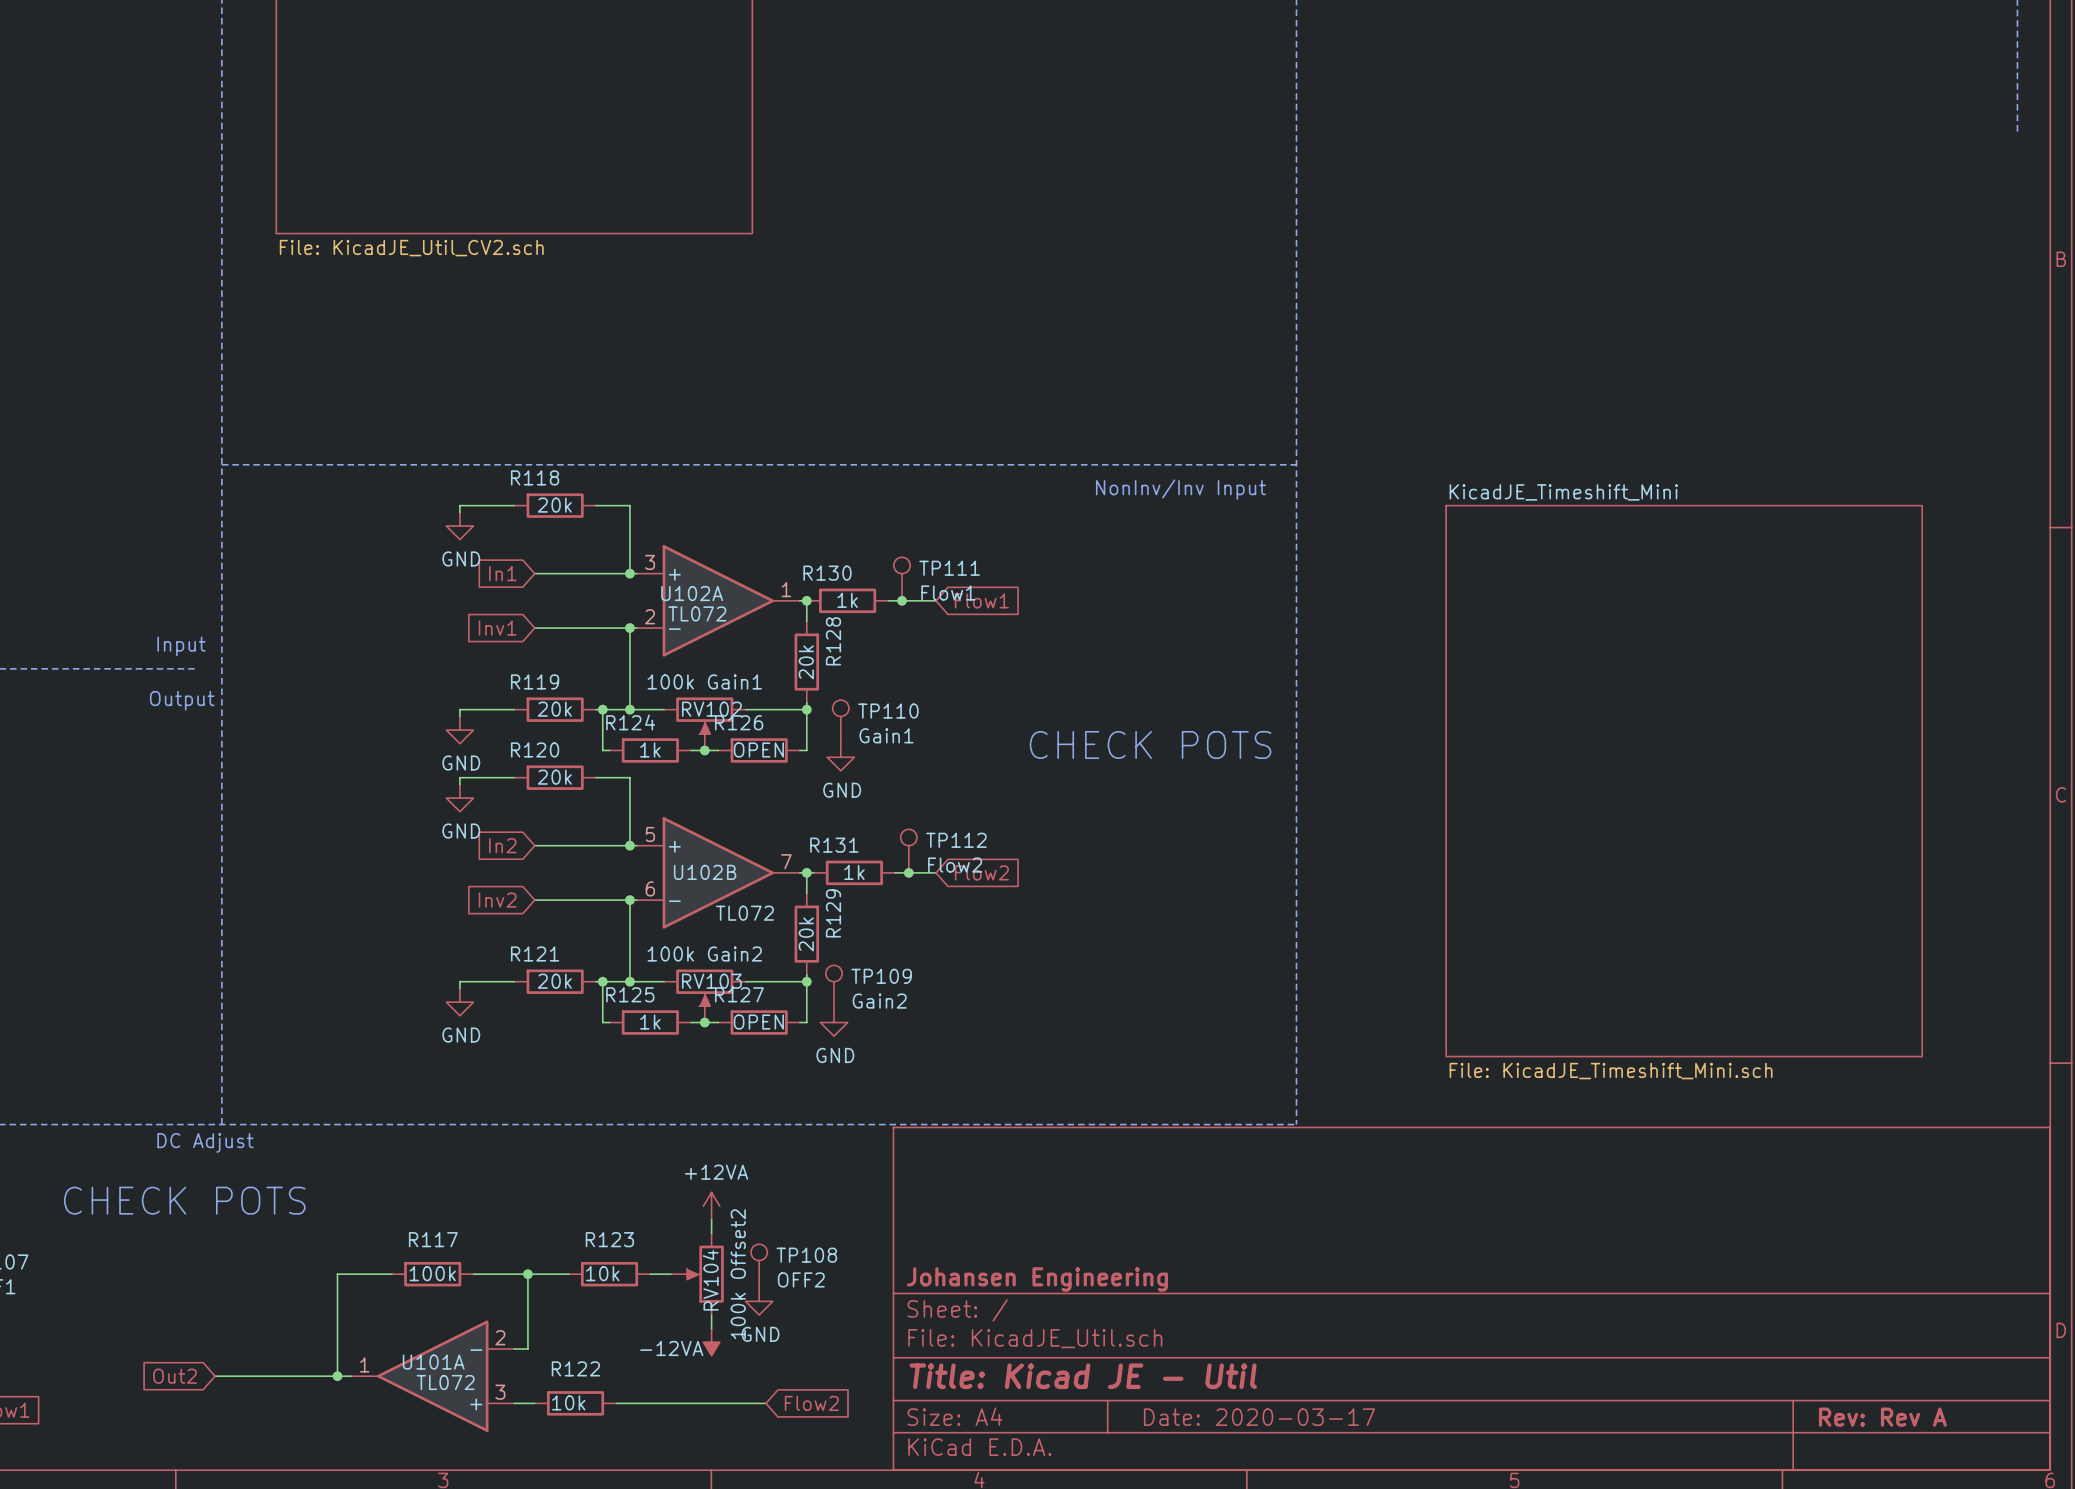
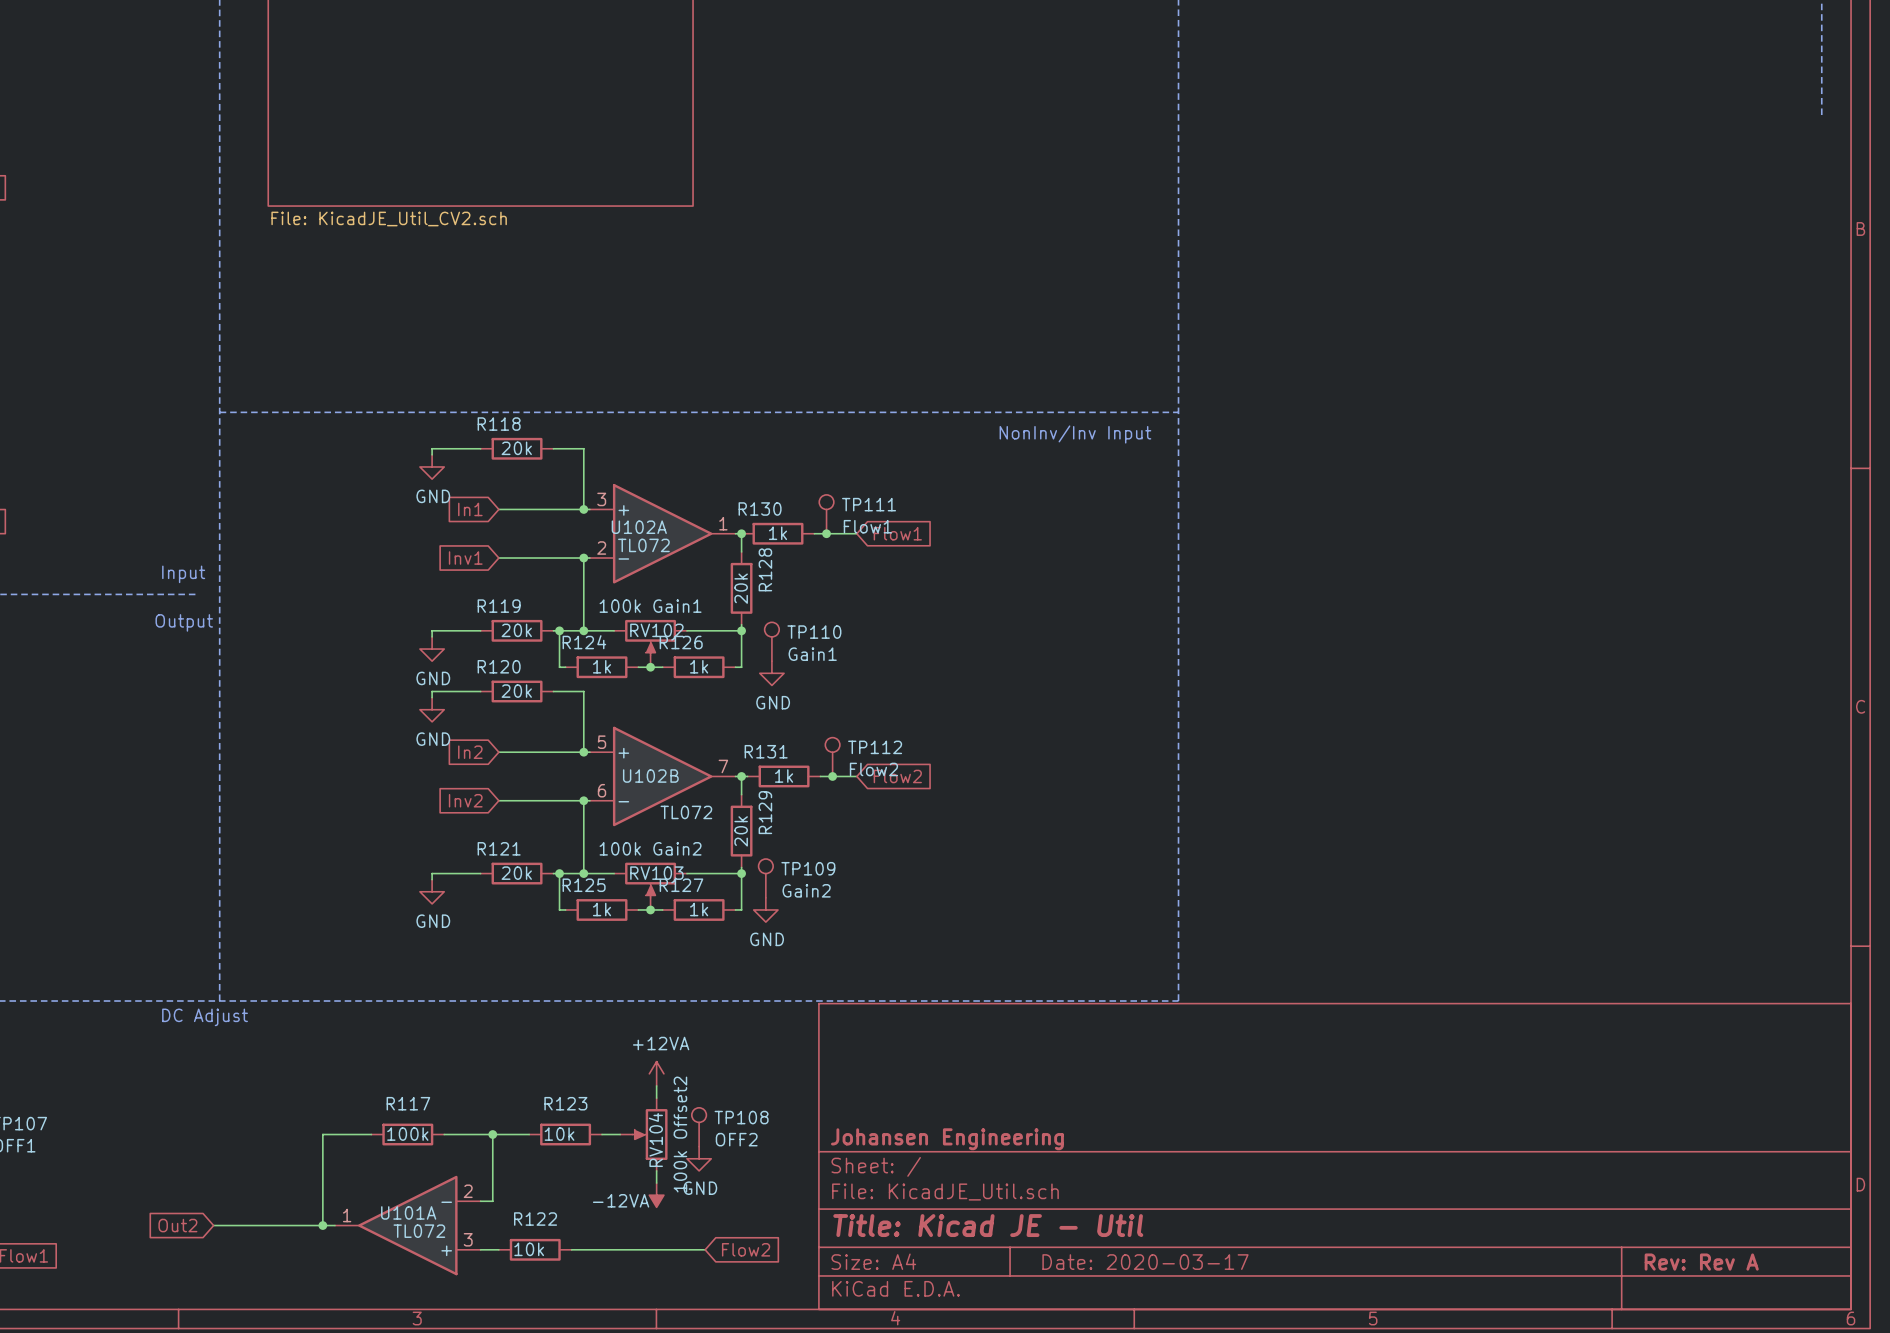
text: CHECK POTS (1150, 744) -> none
R126 value: OPEN (758, 749) -> 1k (699, 666)
sheet KicadJE_Timeshift_Mini: File: KicadJE_Timeshift_Mini.sch (1684, 781) -> none
R127 value: OPEN (758, 1022) -> 1k (699, 909)
text: CHECK POTS (184, 1200) -> none

